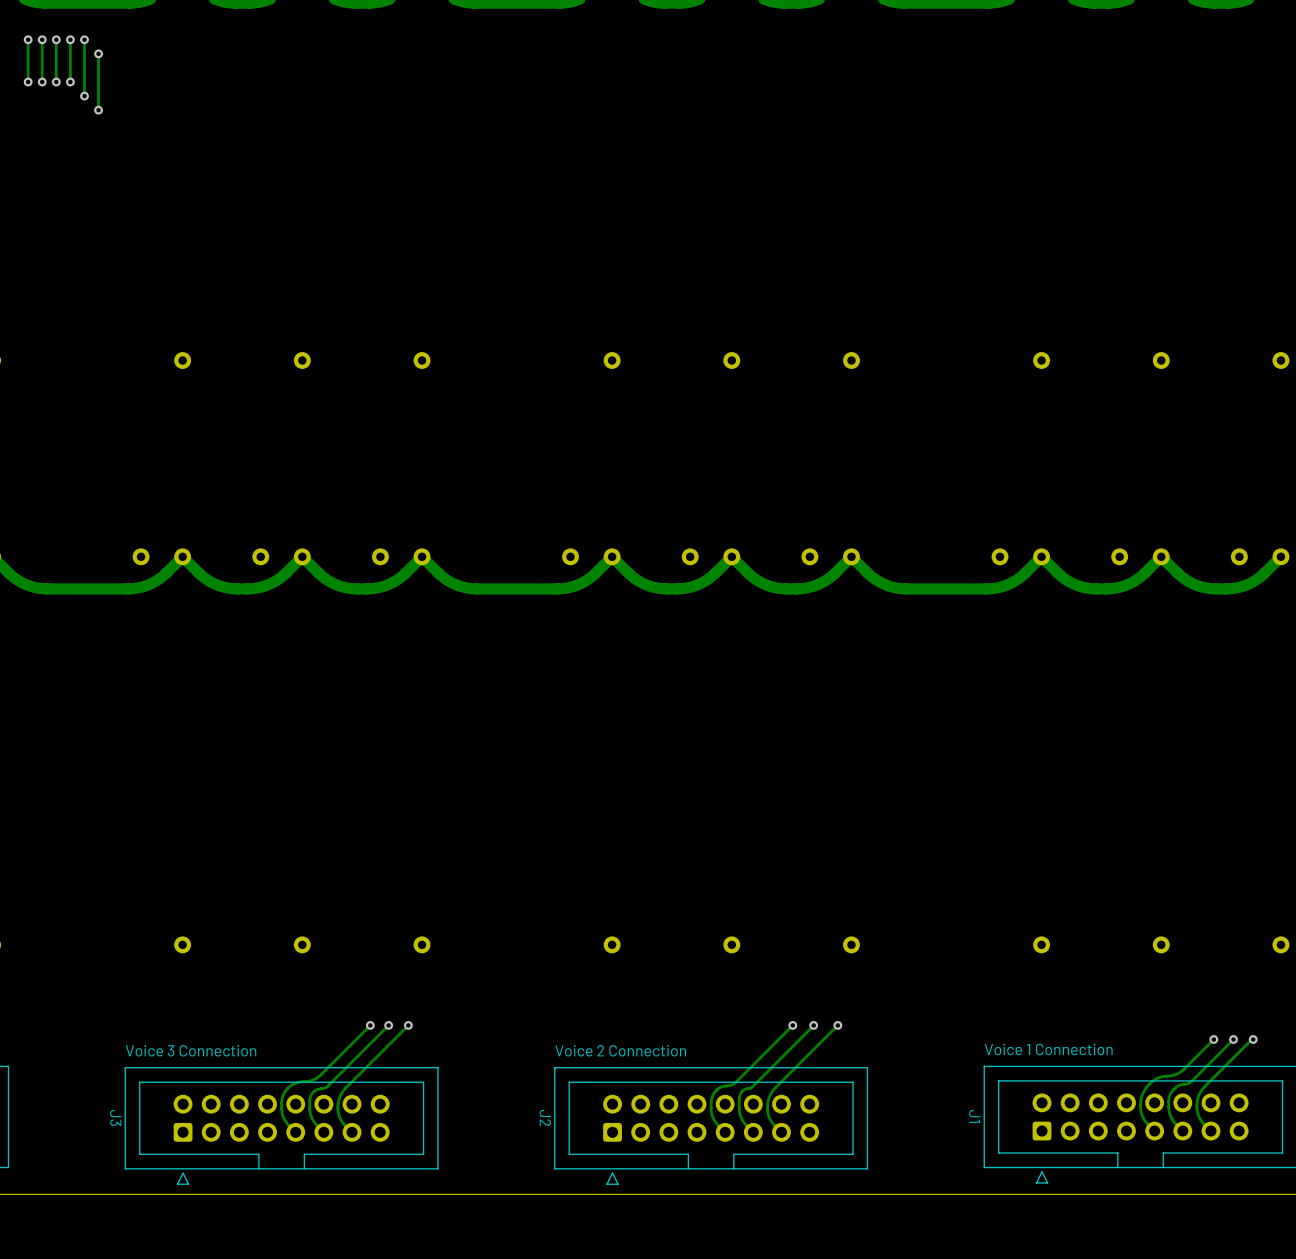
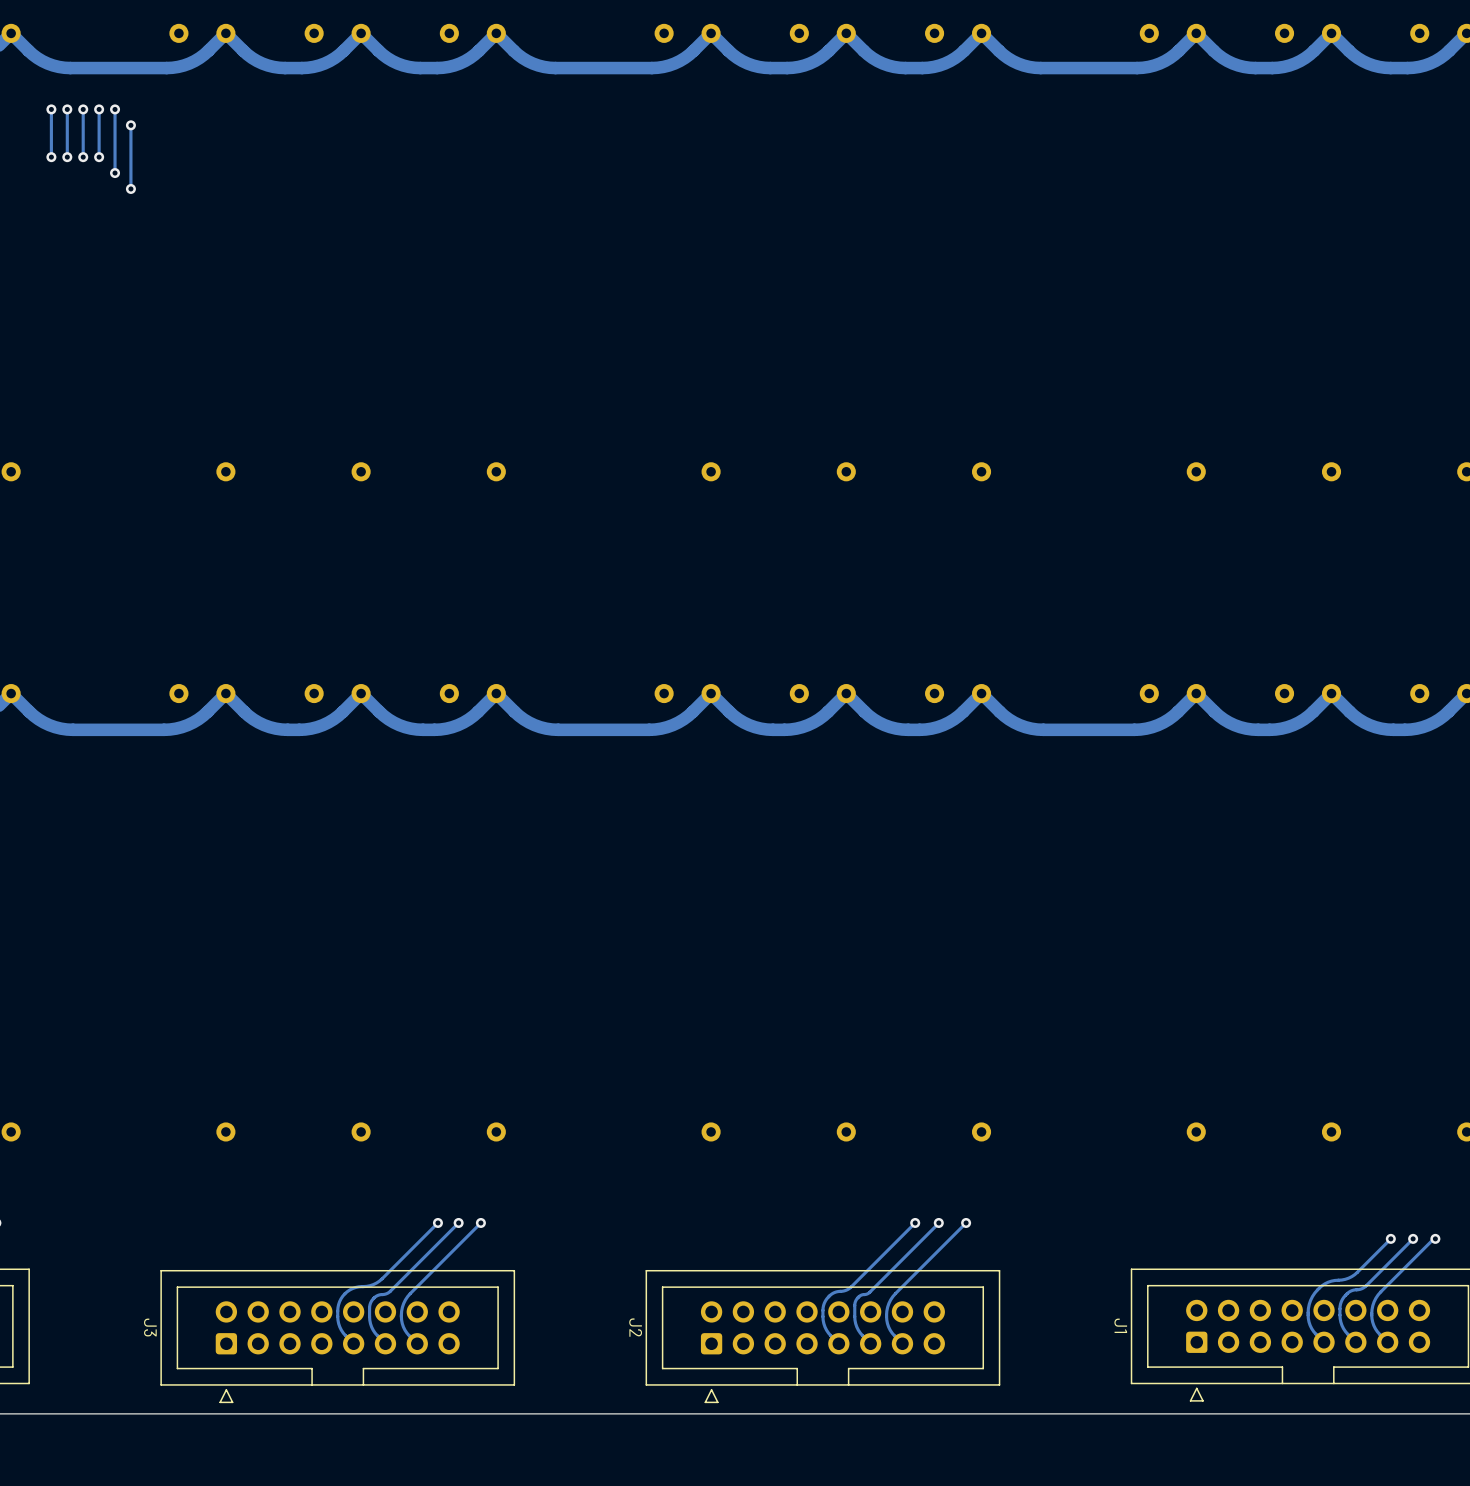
text: Voice 1 Connection (1048, 1049) -> none
text: Voice 3 Connection (191, 1050) -> none
text: Voice 2 Connection (620, 1050) -> none

